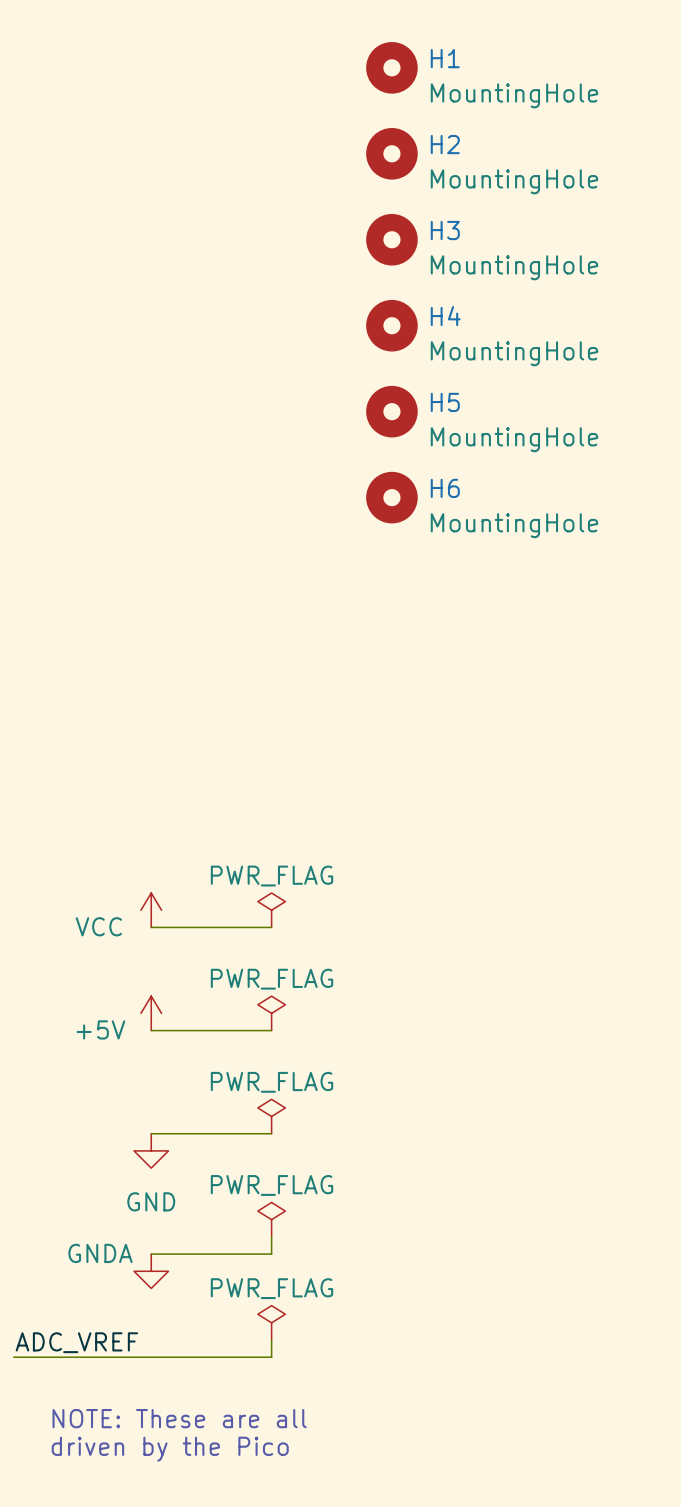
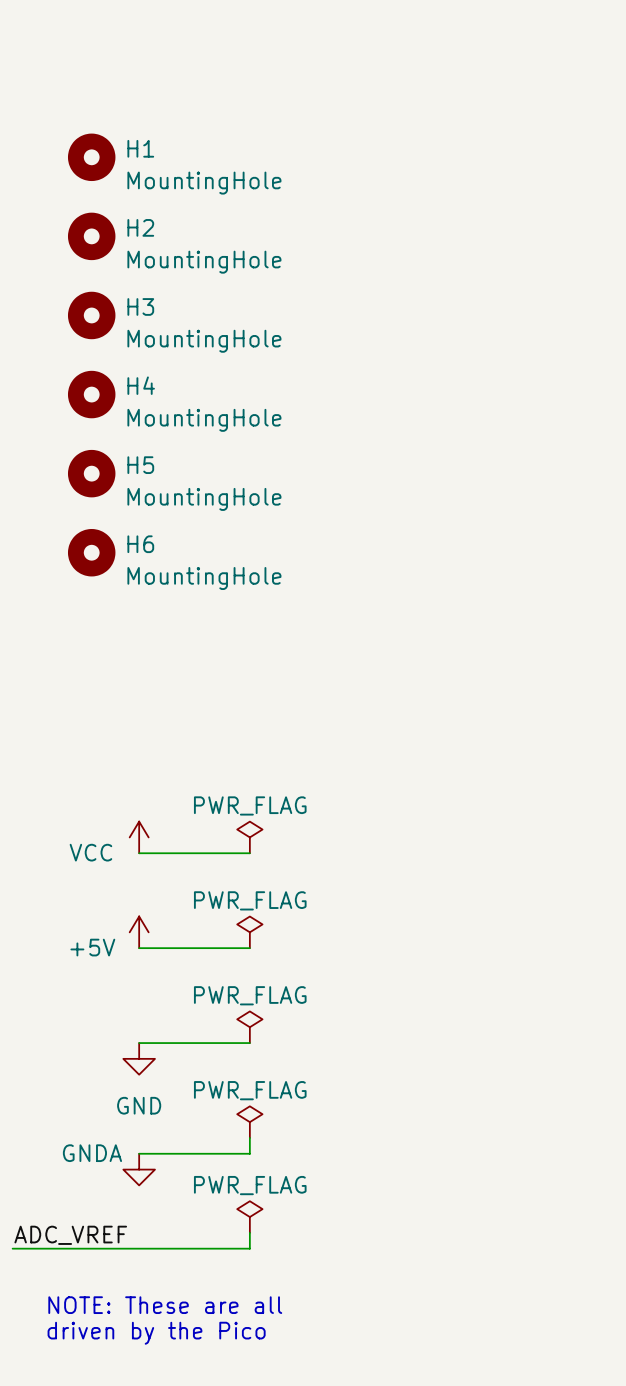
H1 position: (391, 67) -> (91, 157)
H2 position: (391, 153) -> (91, 236)
H3 position: (391, 239) -> (91, 315)
H4 position: (391, 325) -> (91, 394)
H5 position: (391, 411) -> (91, 473)
H6 position: (391, 497) -> (91, 552)

